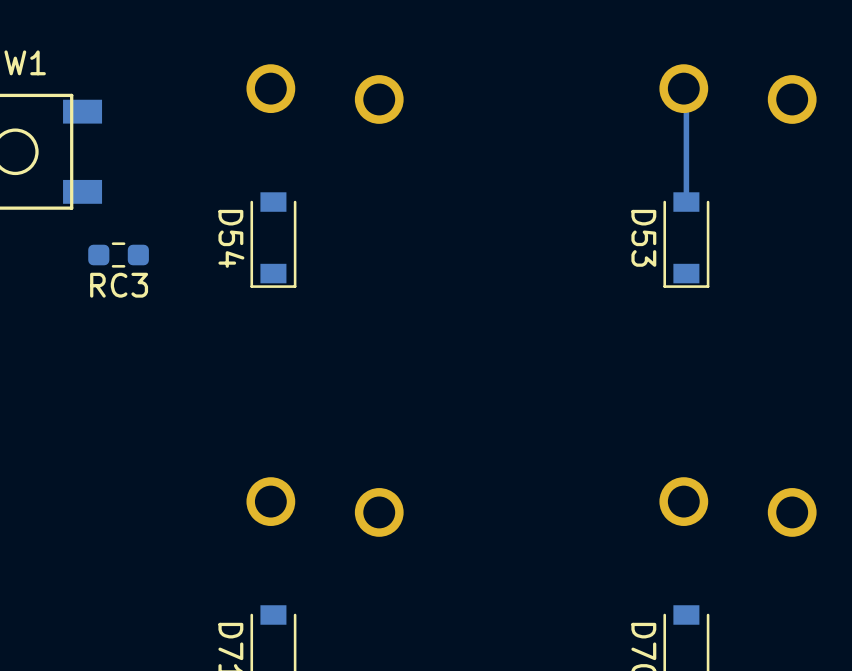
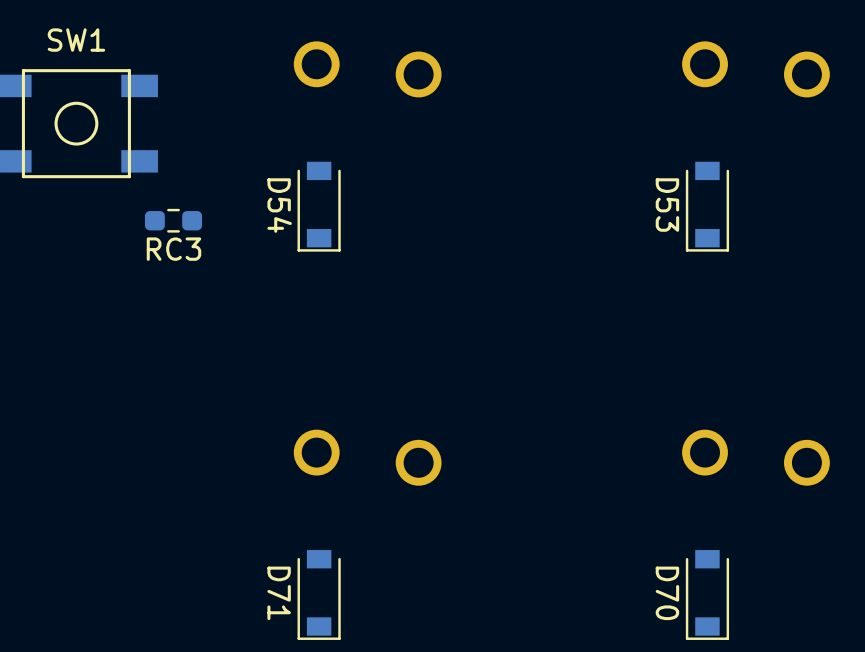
track: (683, 88) (686, 91) (686, 202) -> none

